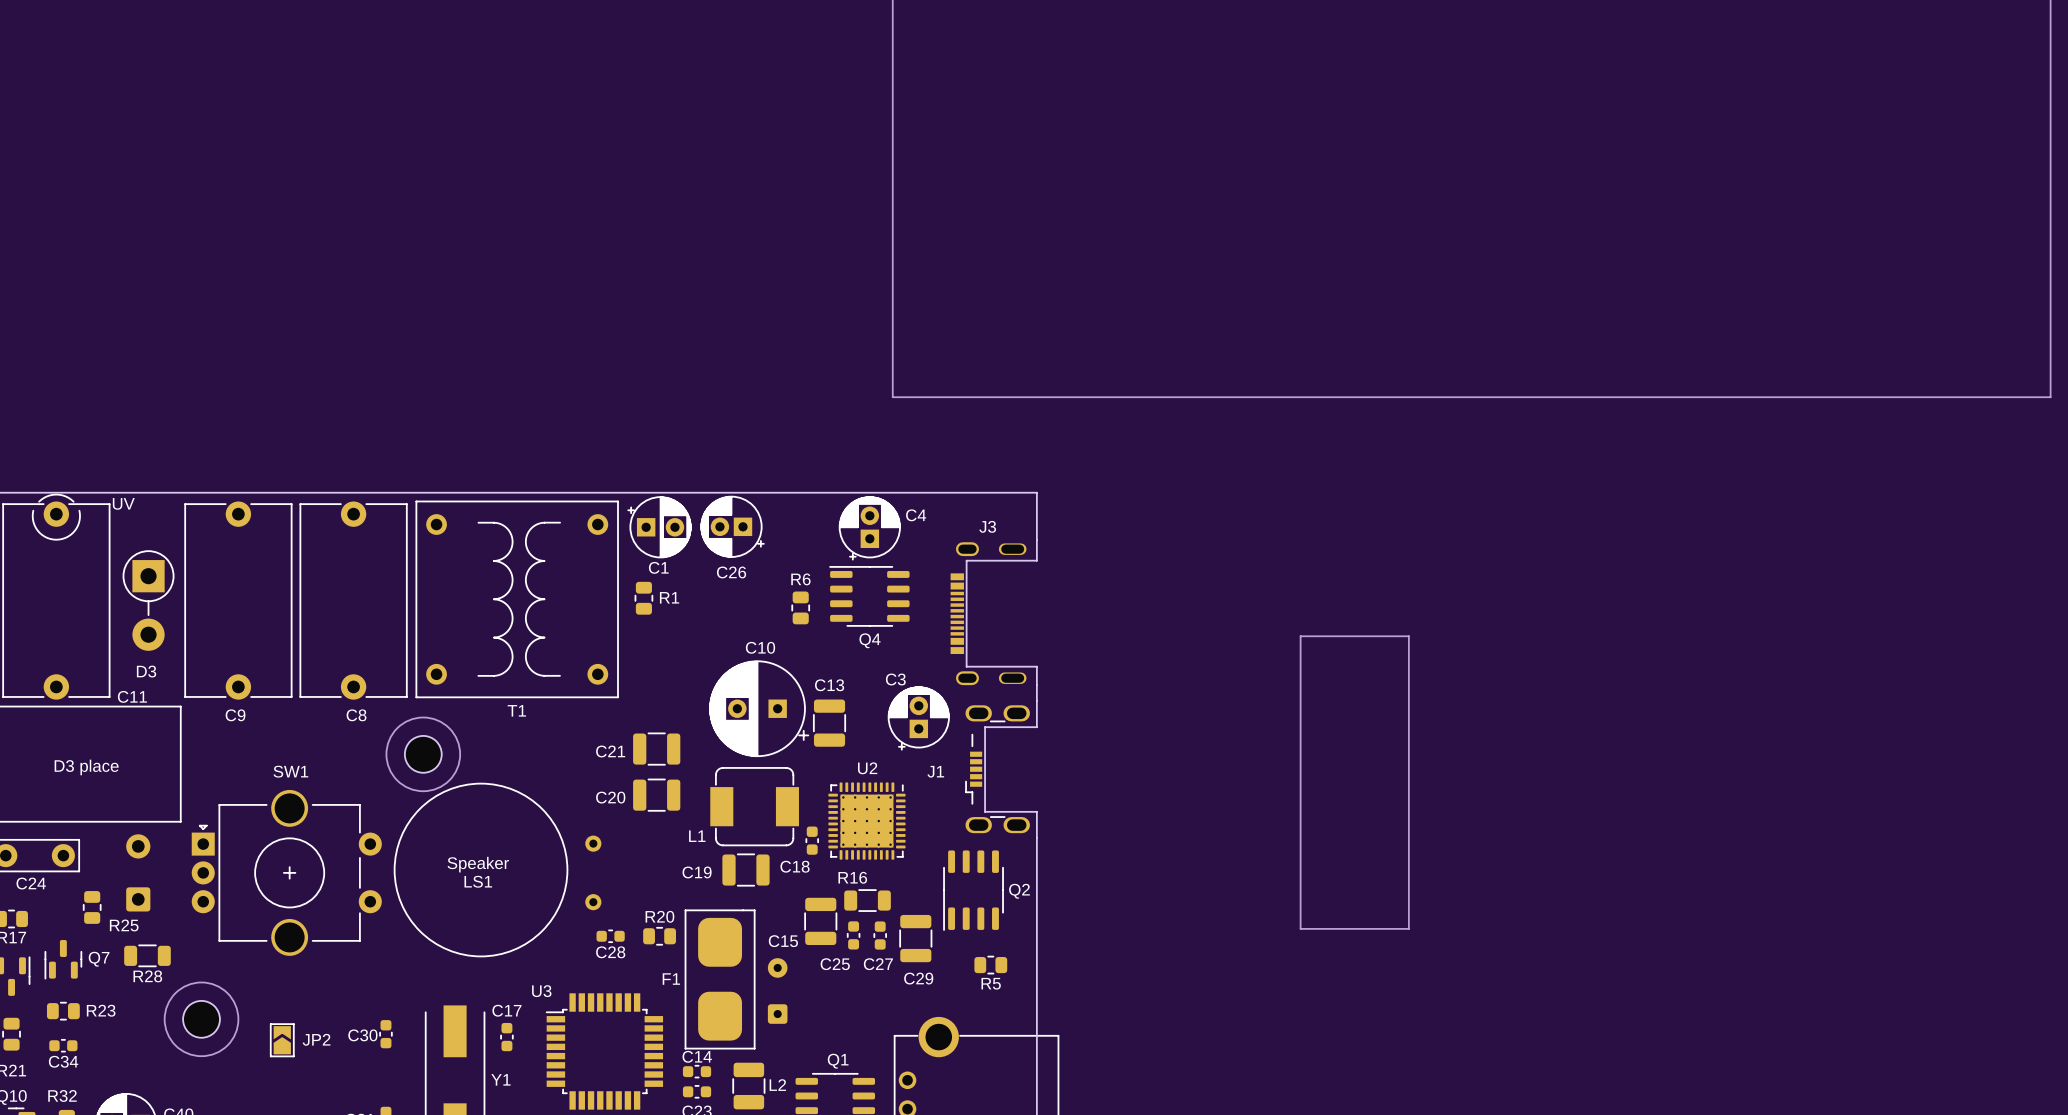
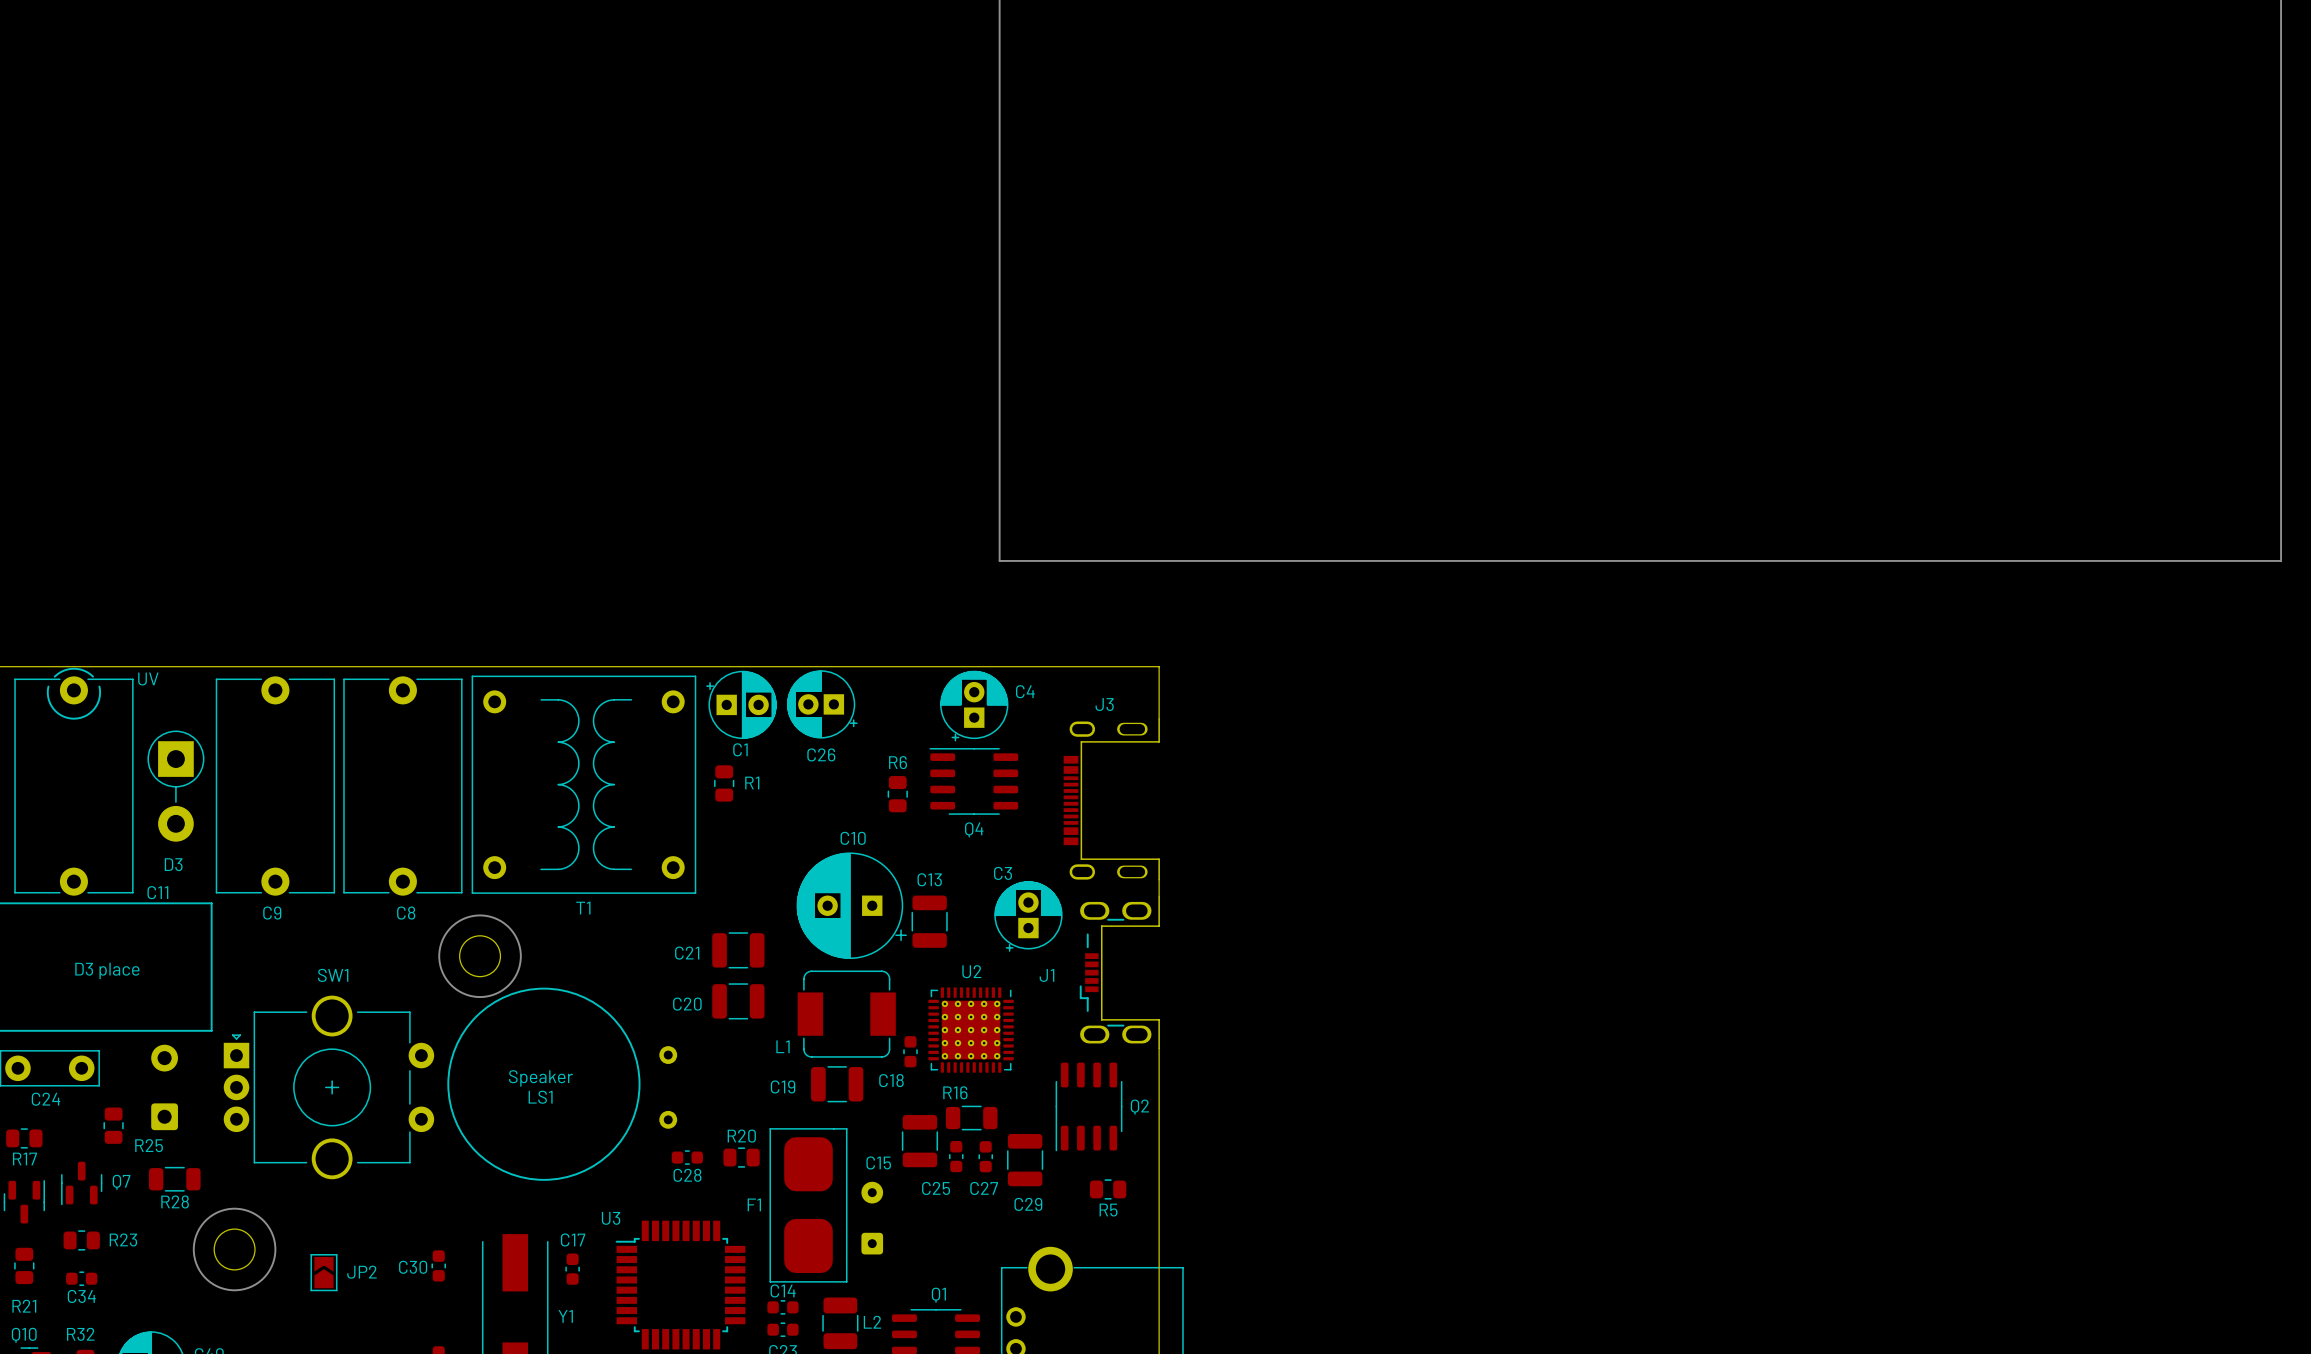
line: (1300, 636) (1408, 636) (1408, 928) (1300, 928) (1300, 636) -> none

